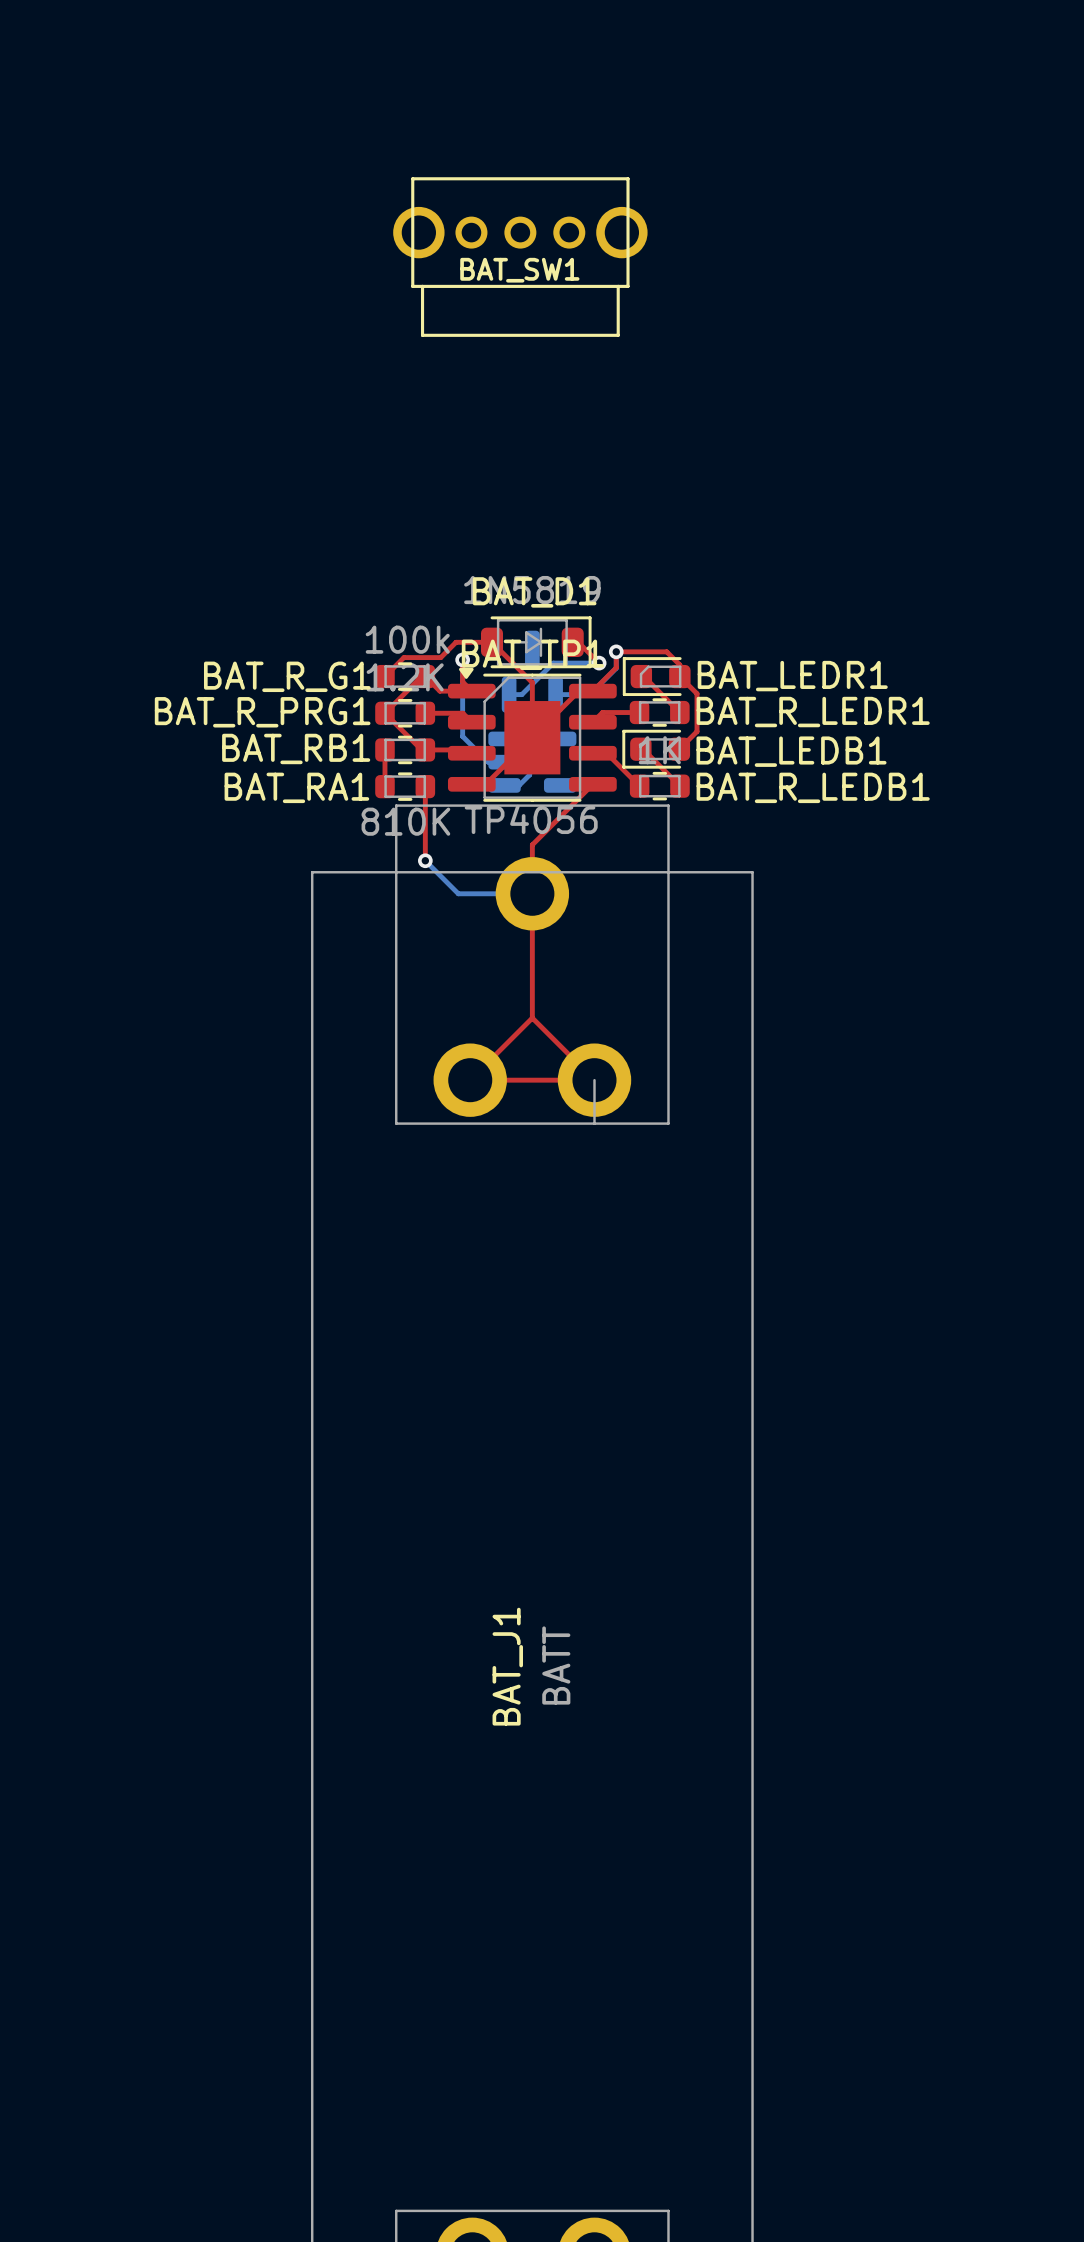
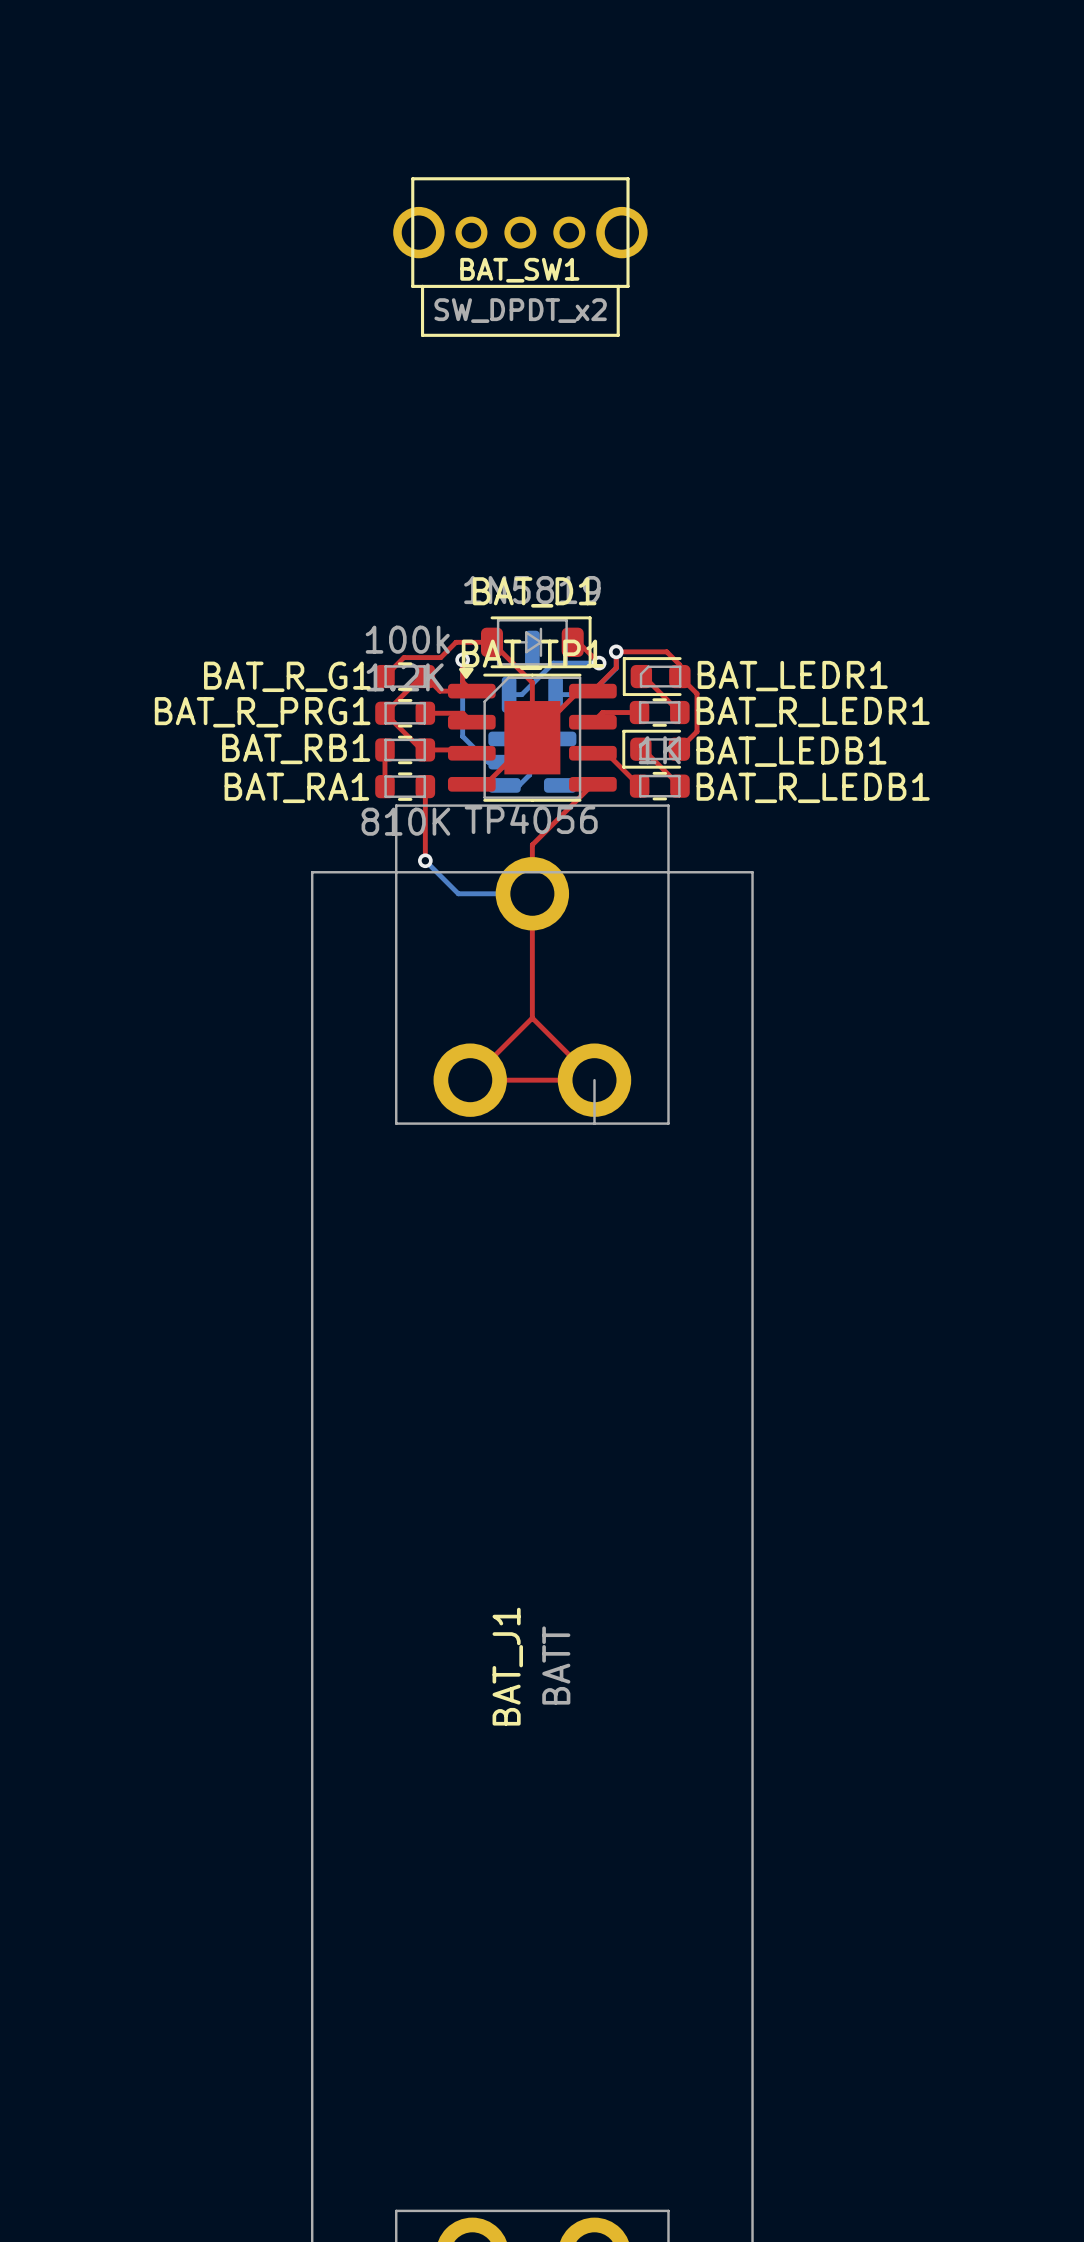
BAT_SW1 value: none -> SW_DPDT_x2 (520, 310)

